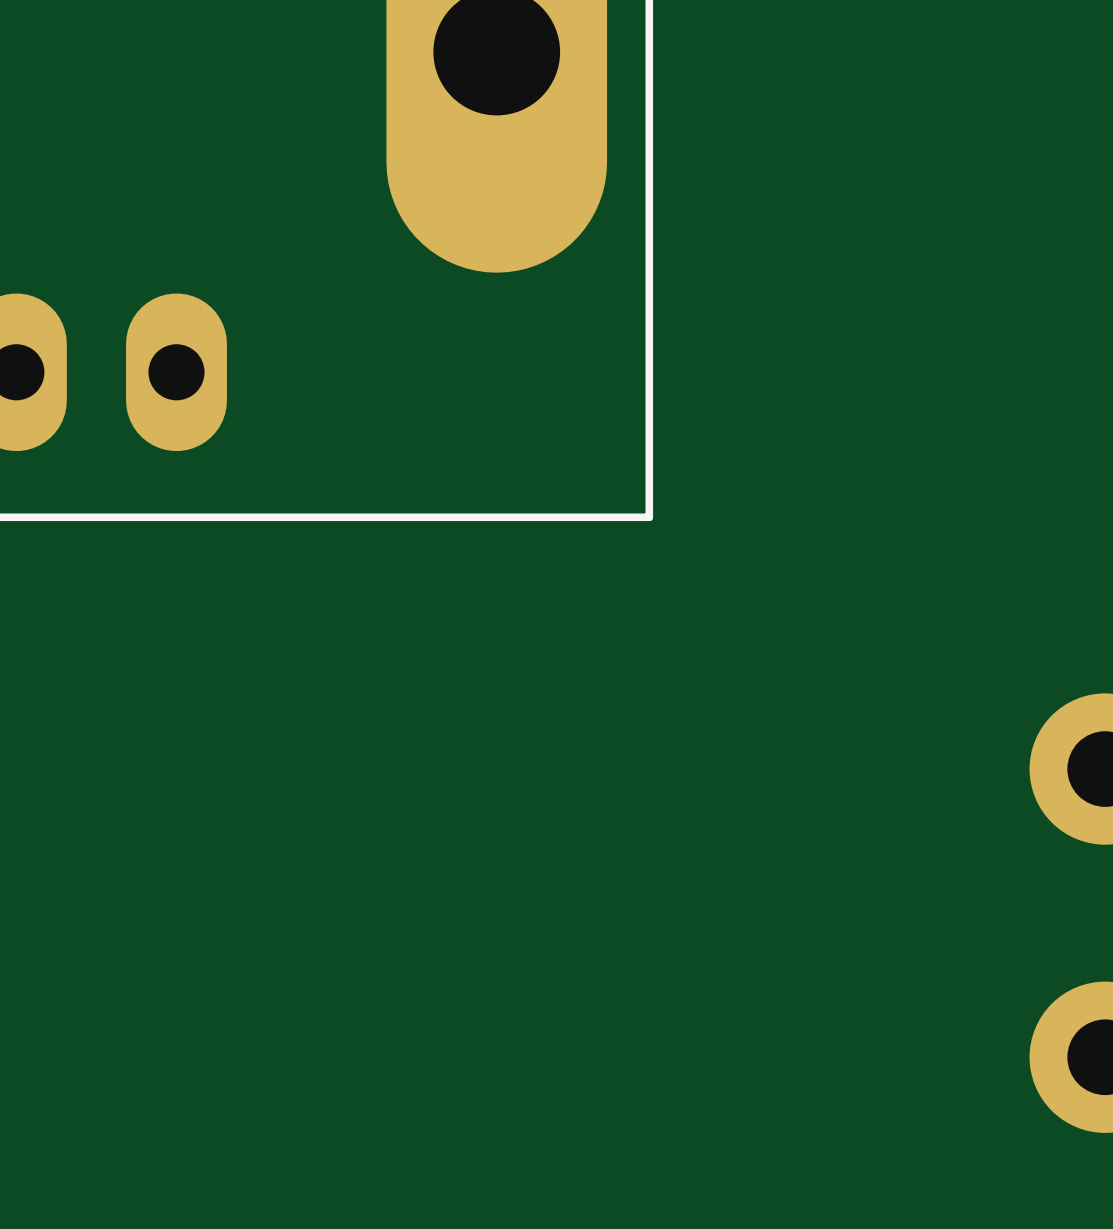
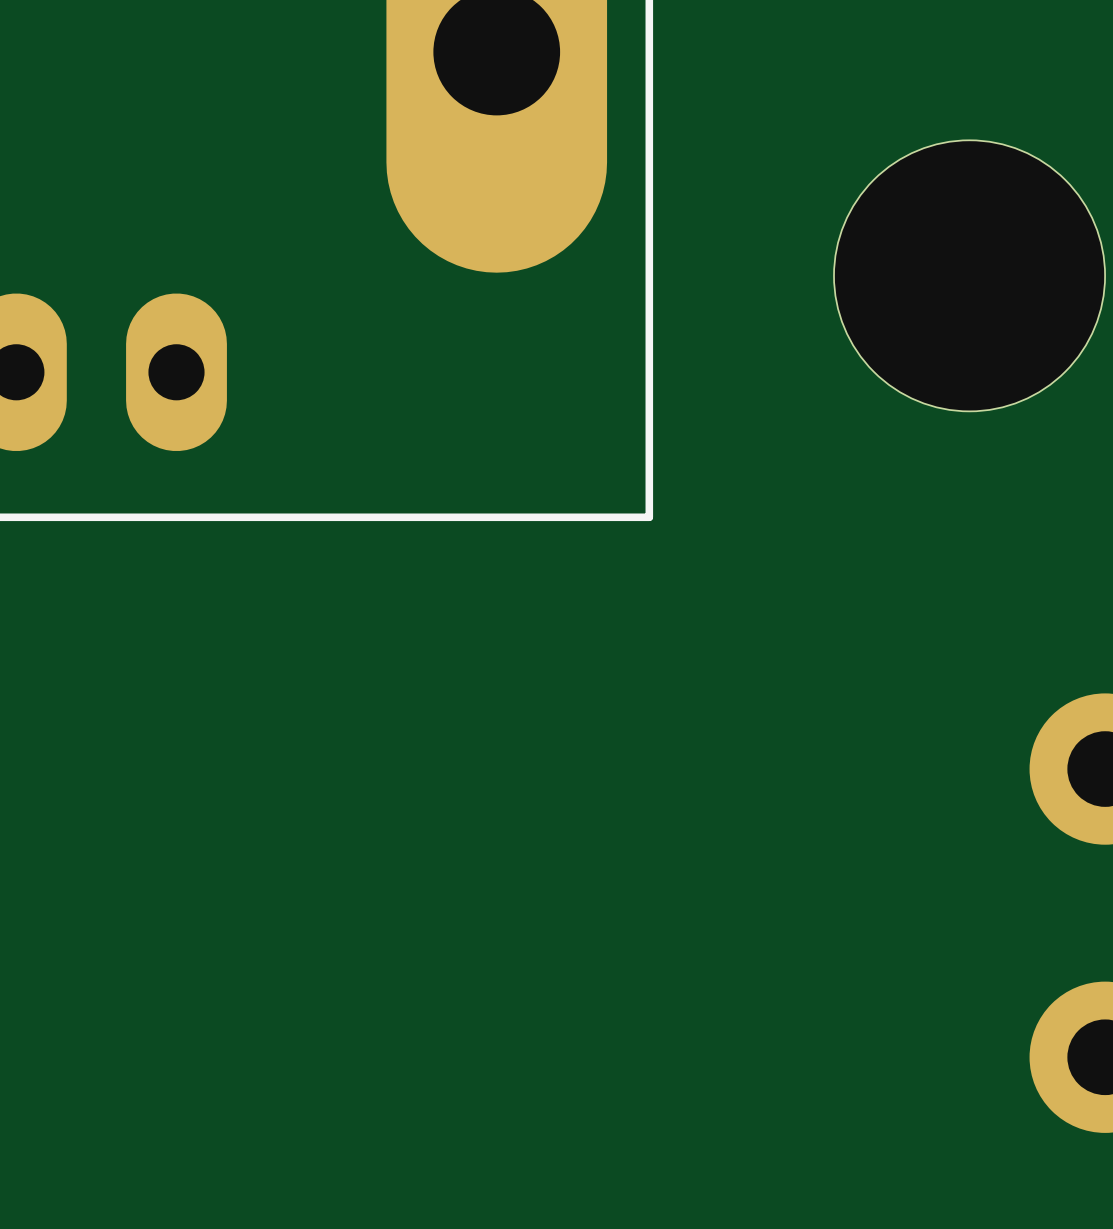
part: none -> (969, 275)

